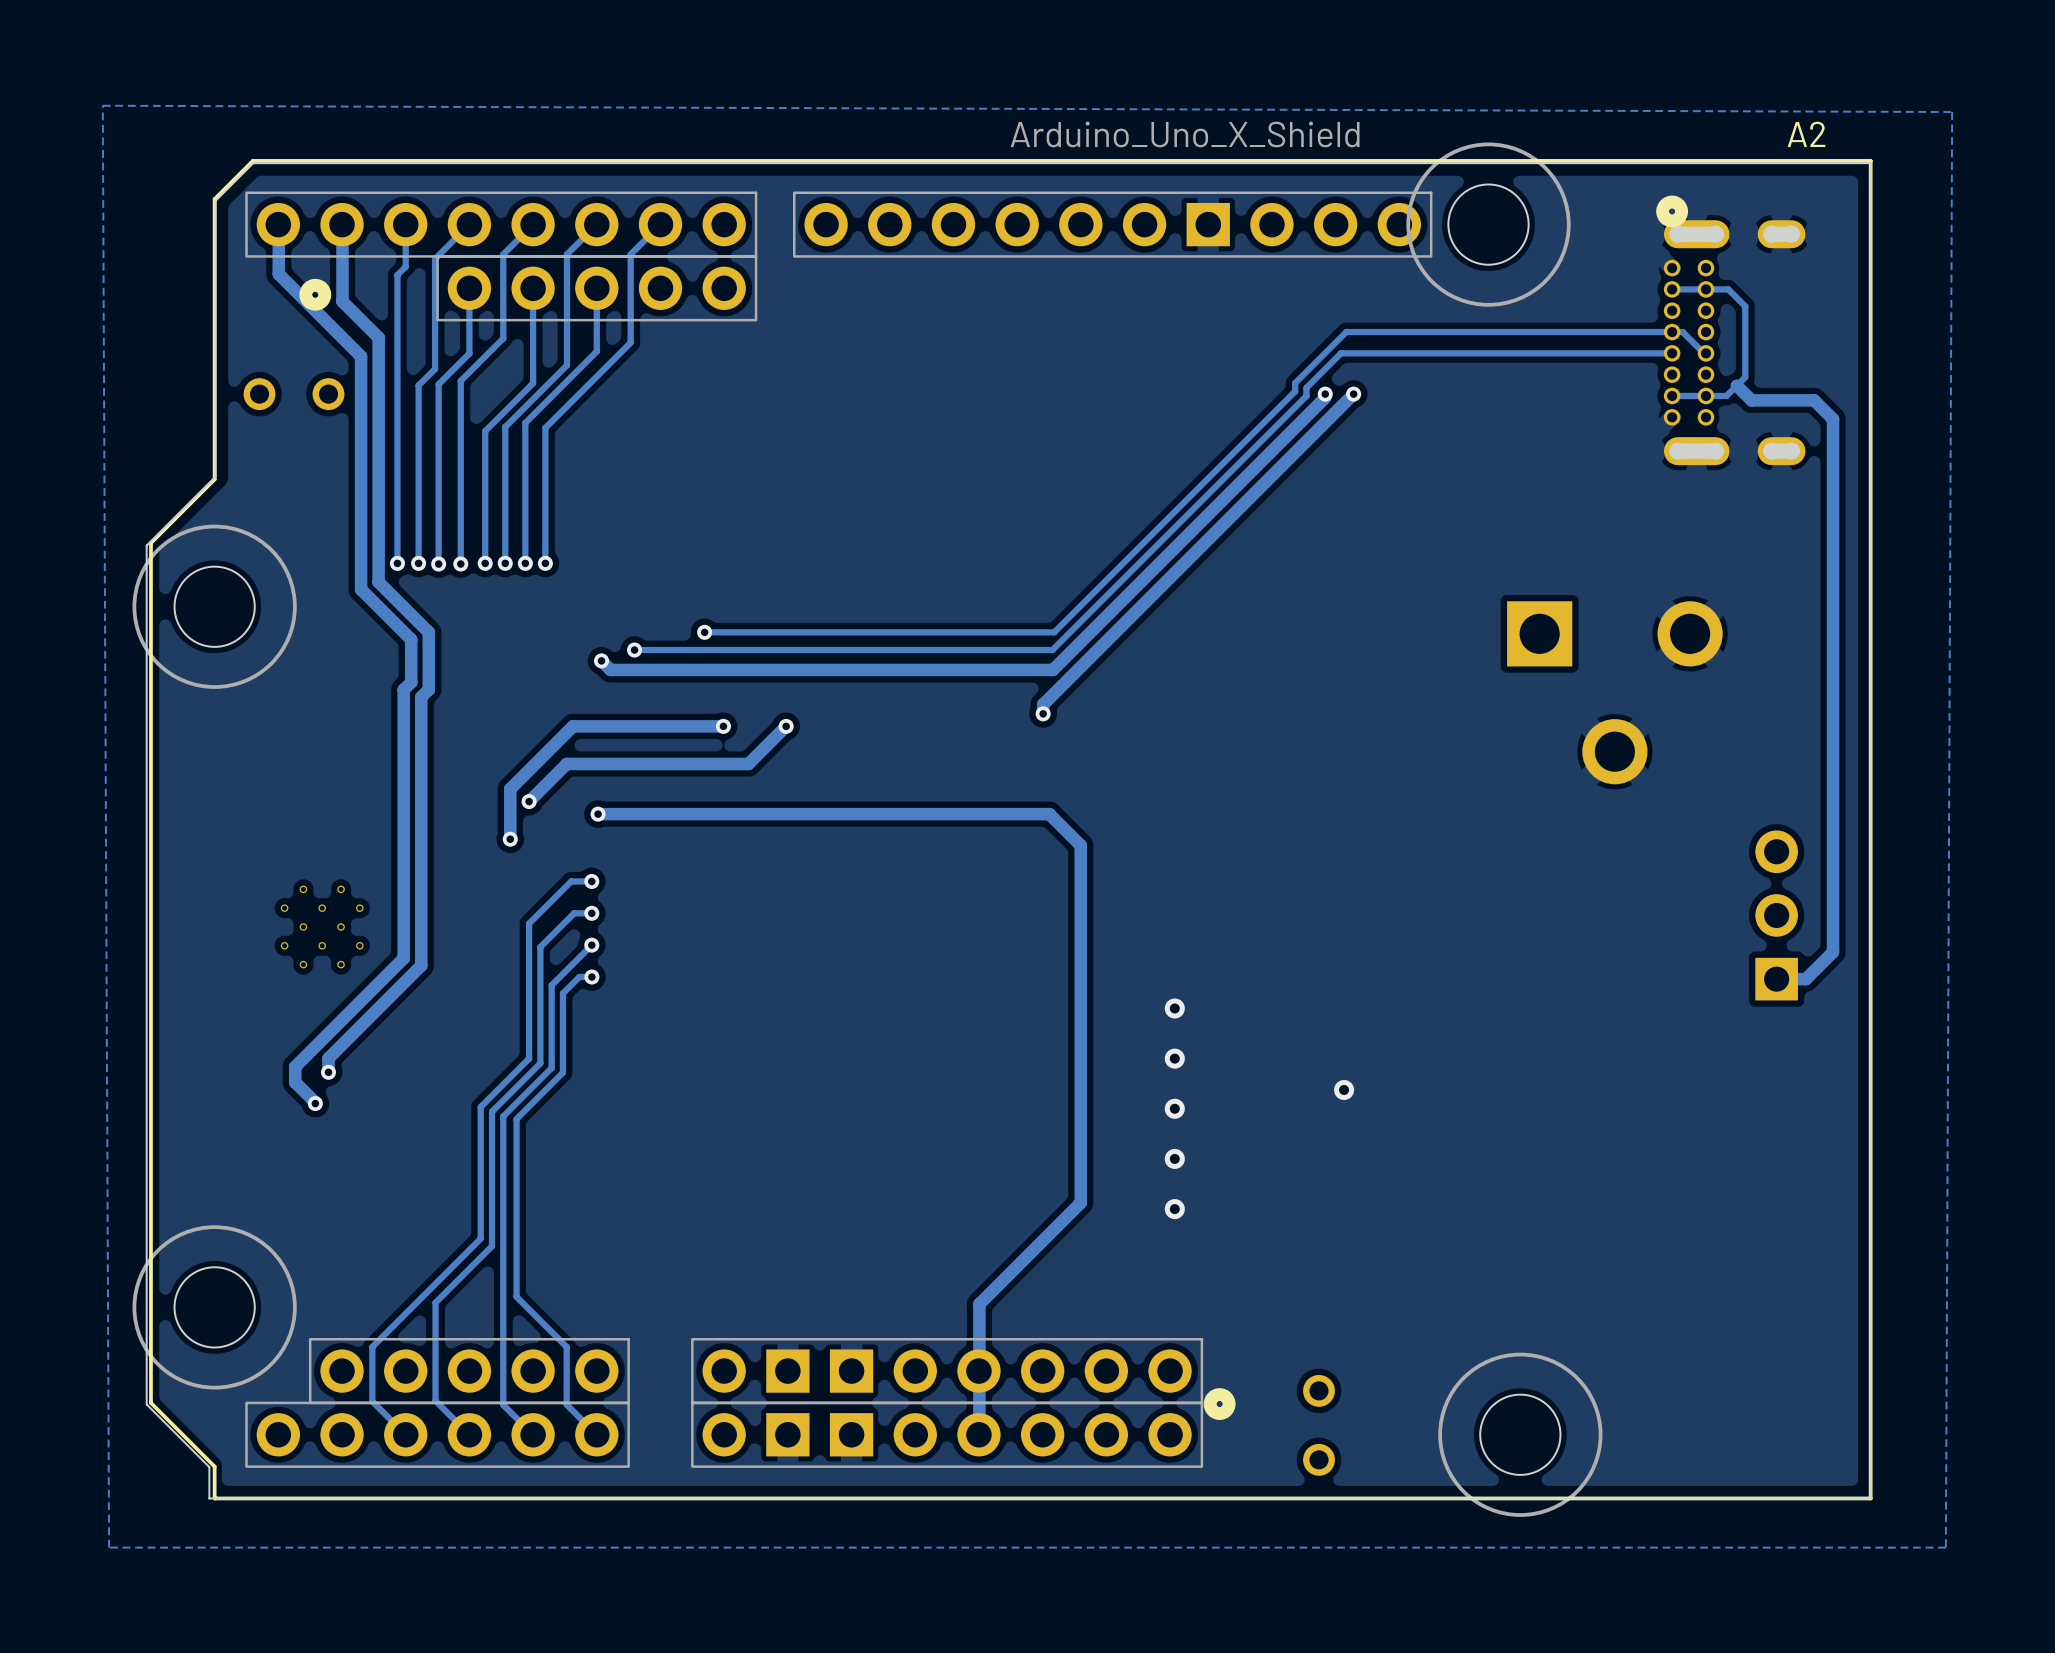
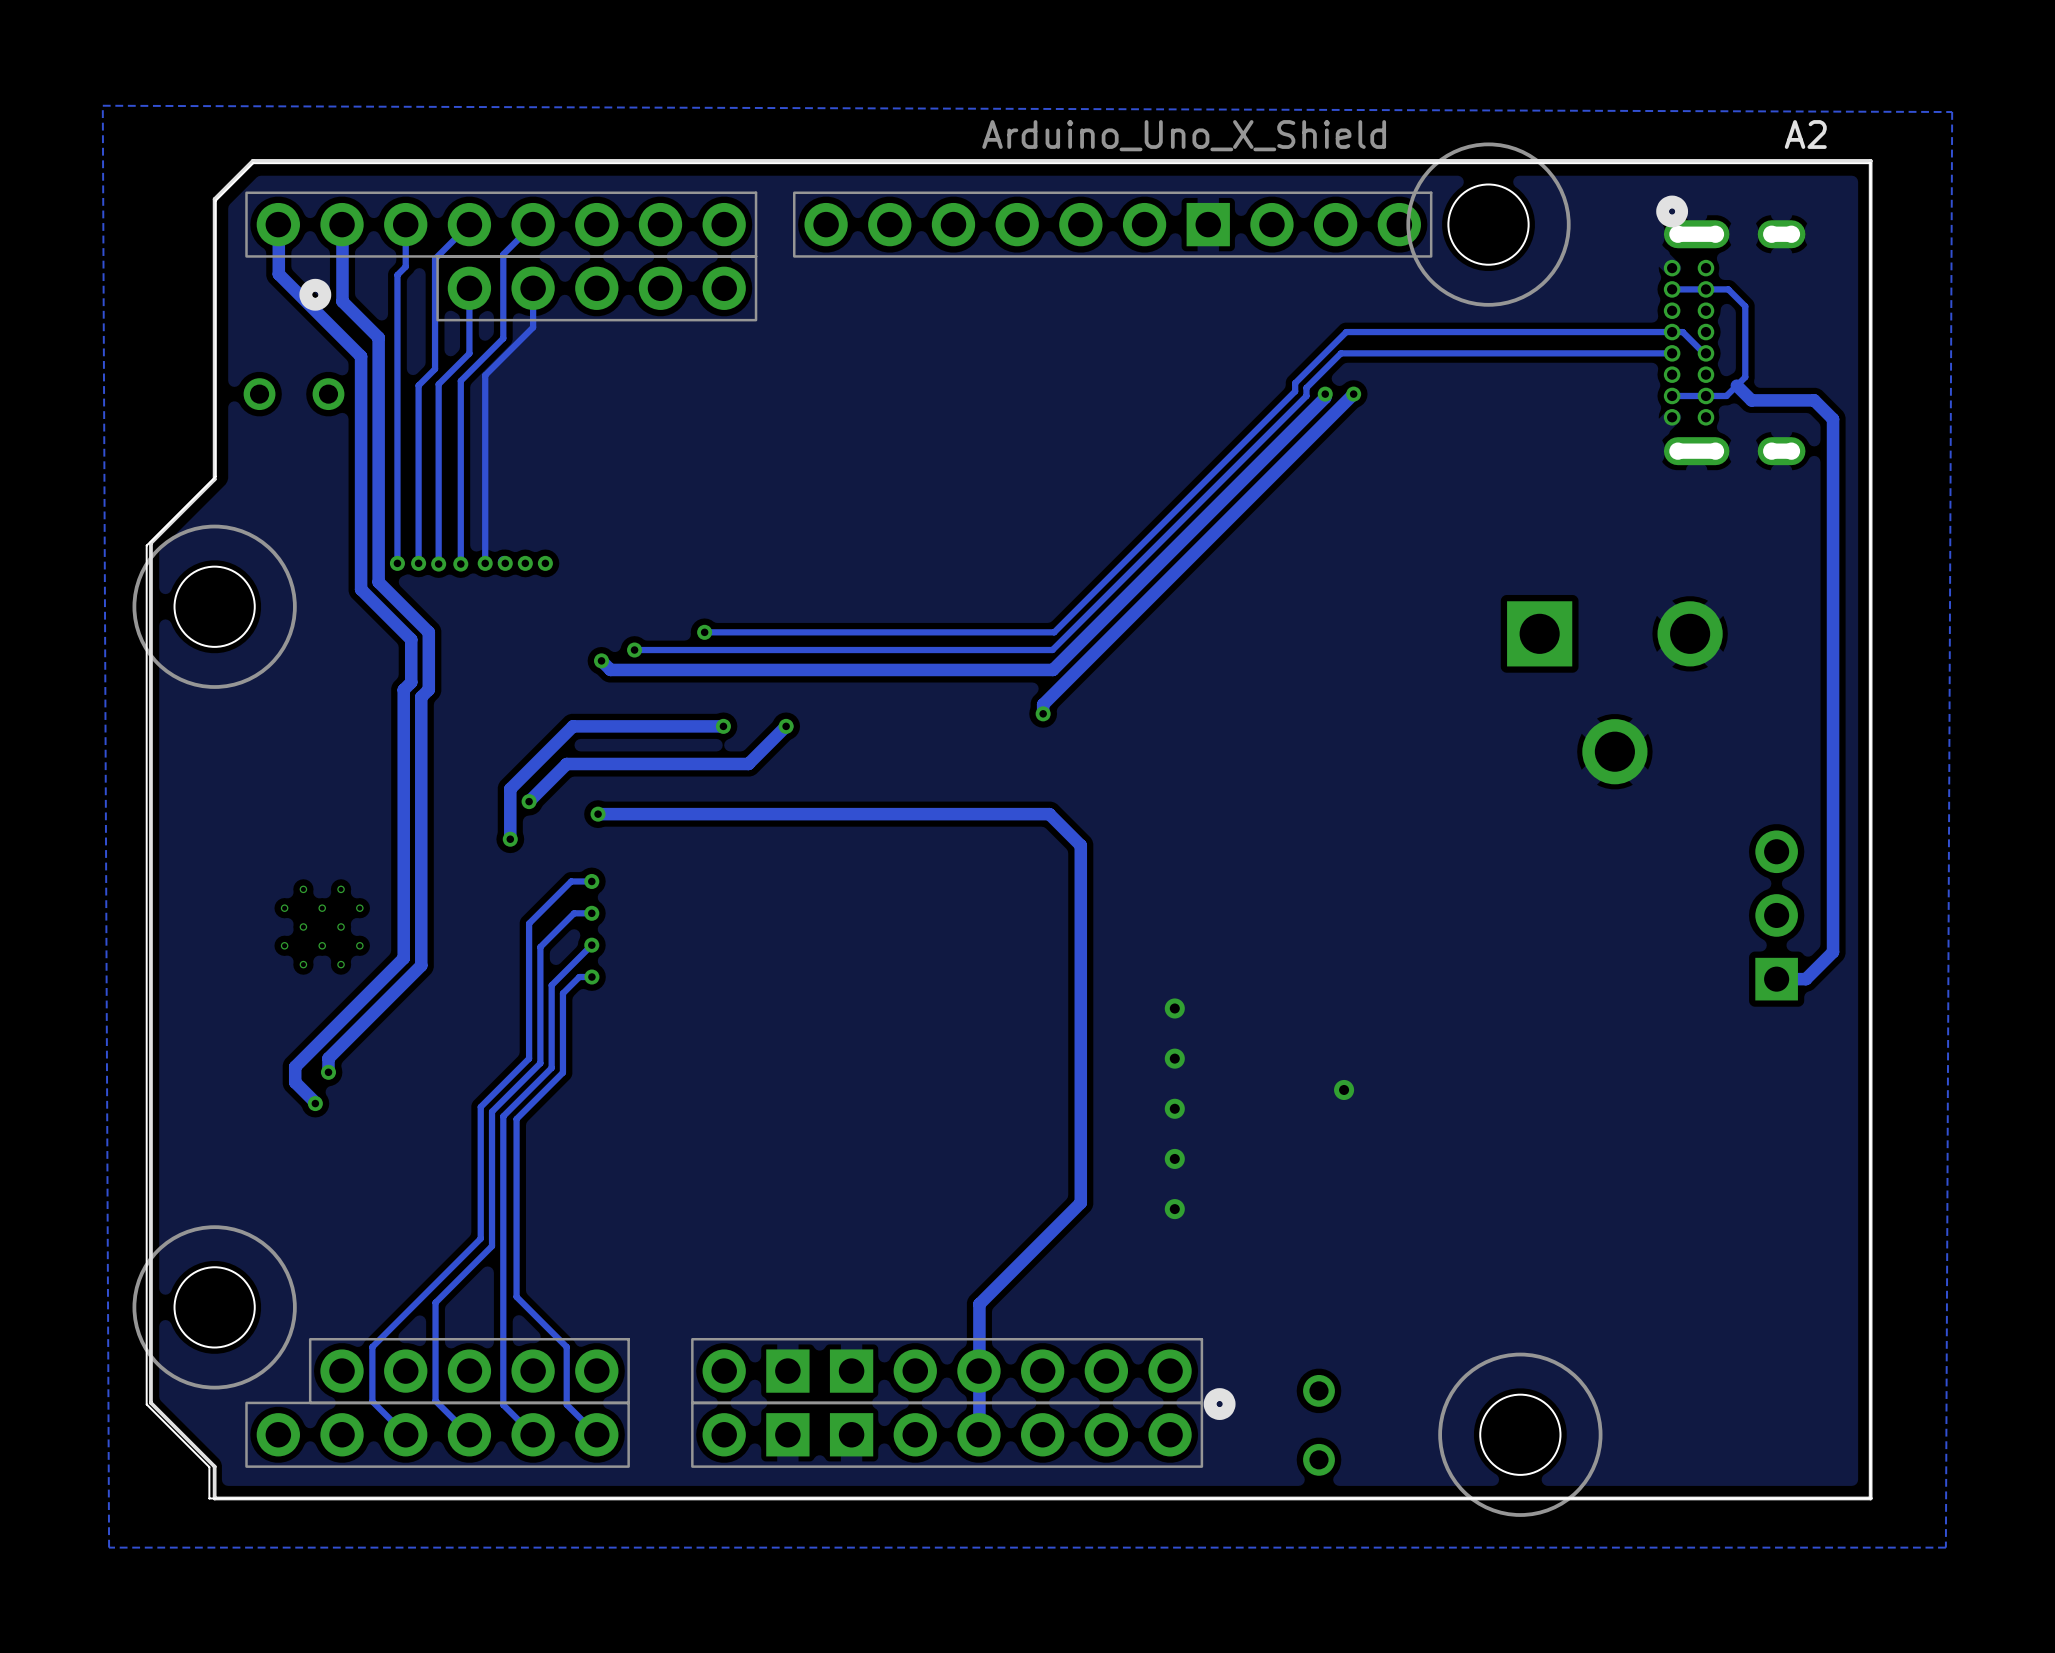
track: (596, 224) (567, 254) (567, 365) (505, 427) (505, 563) -> none
track: (660, 224) (630, 254) (630, 342) (545, 427) (545, 563) -> none
track: (596, 288) (596, 351) (525, 422) (525, 563) -> none
track: (533, 327) (533, 383) (485, 431) -> (533, 327) (485, 375) (485, 431)

